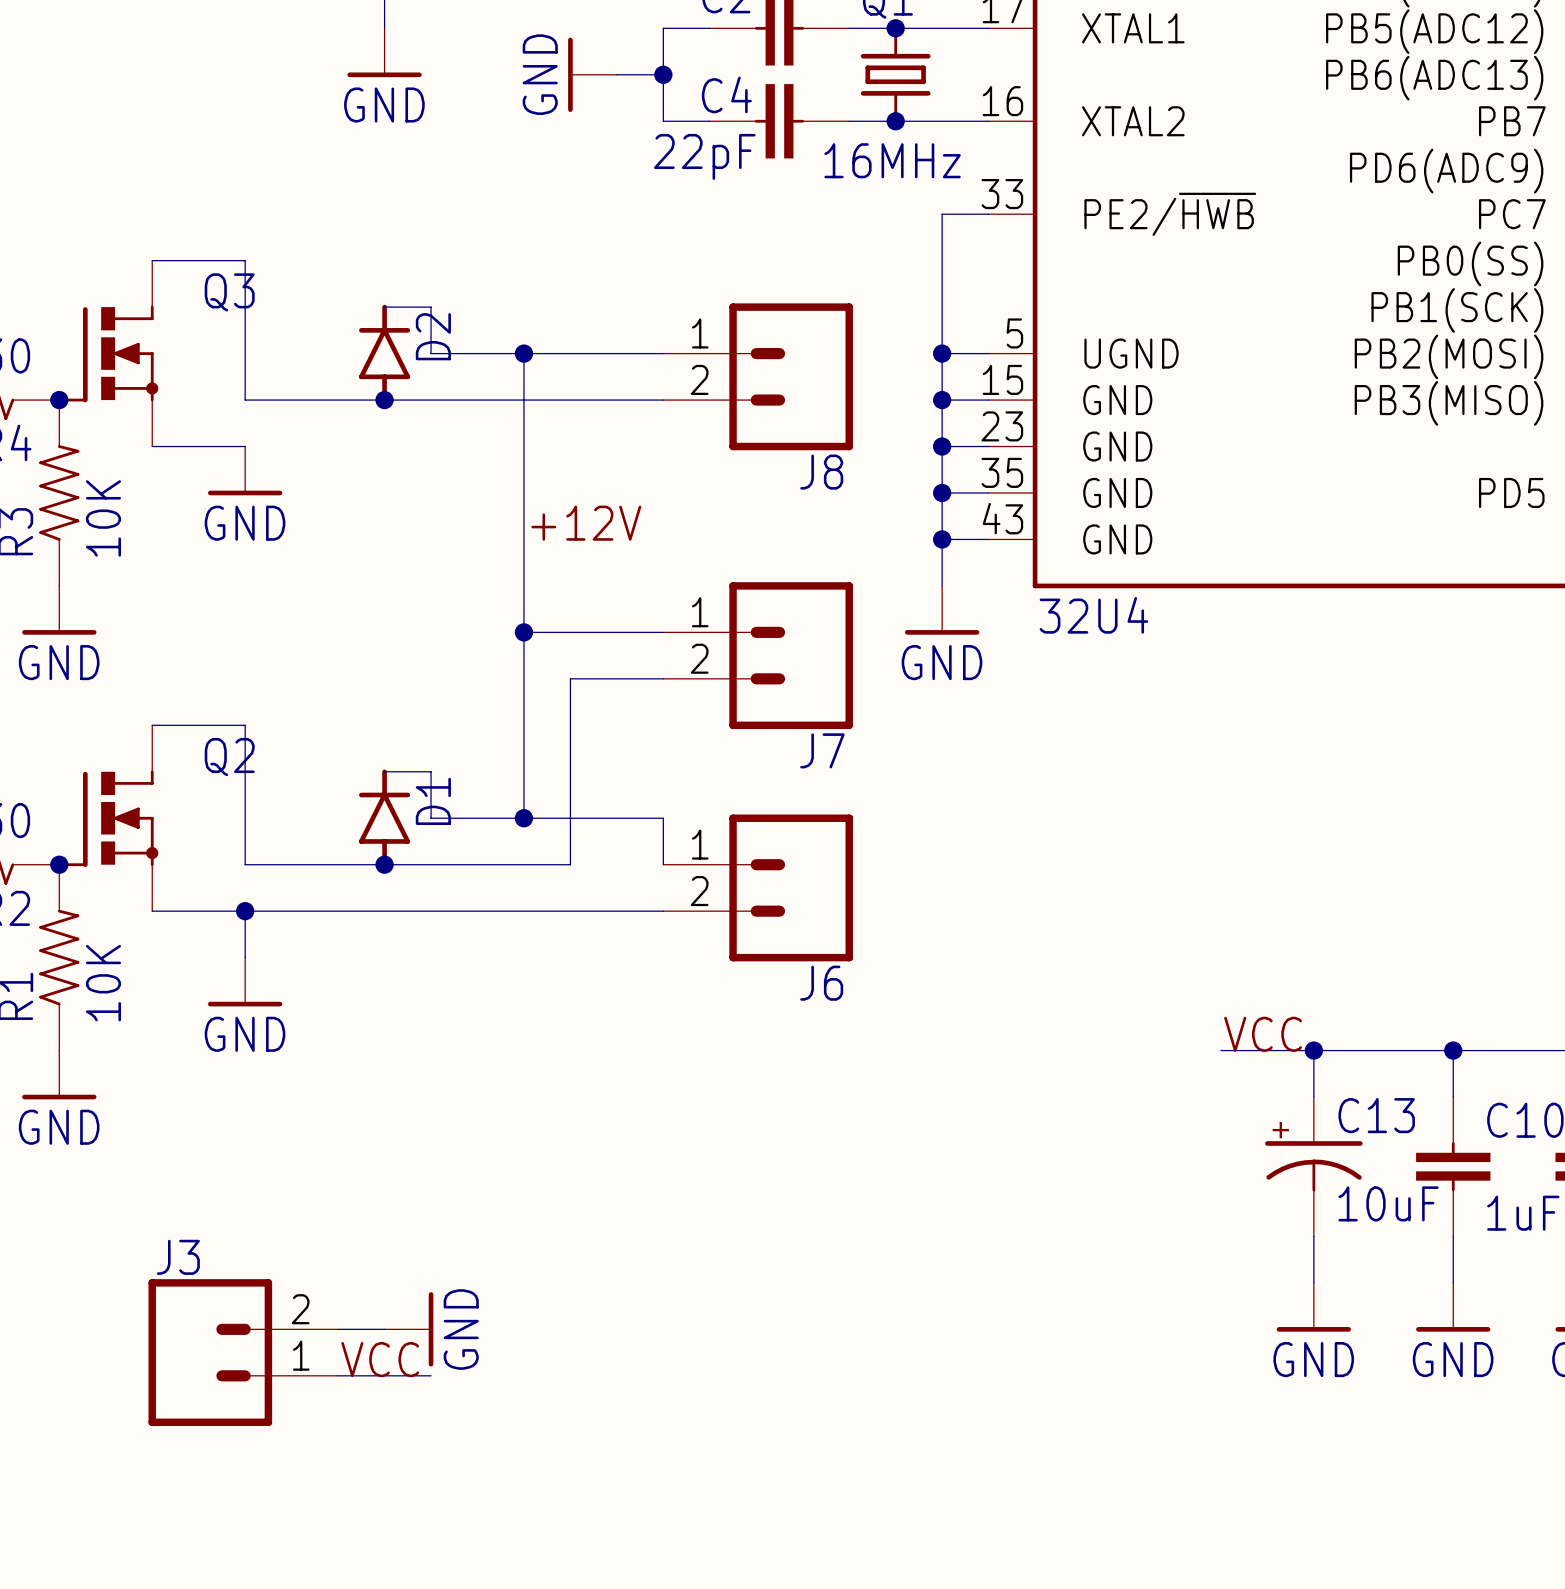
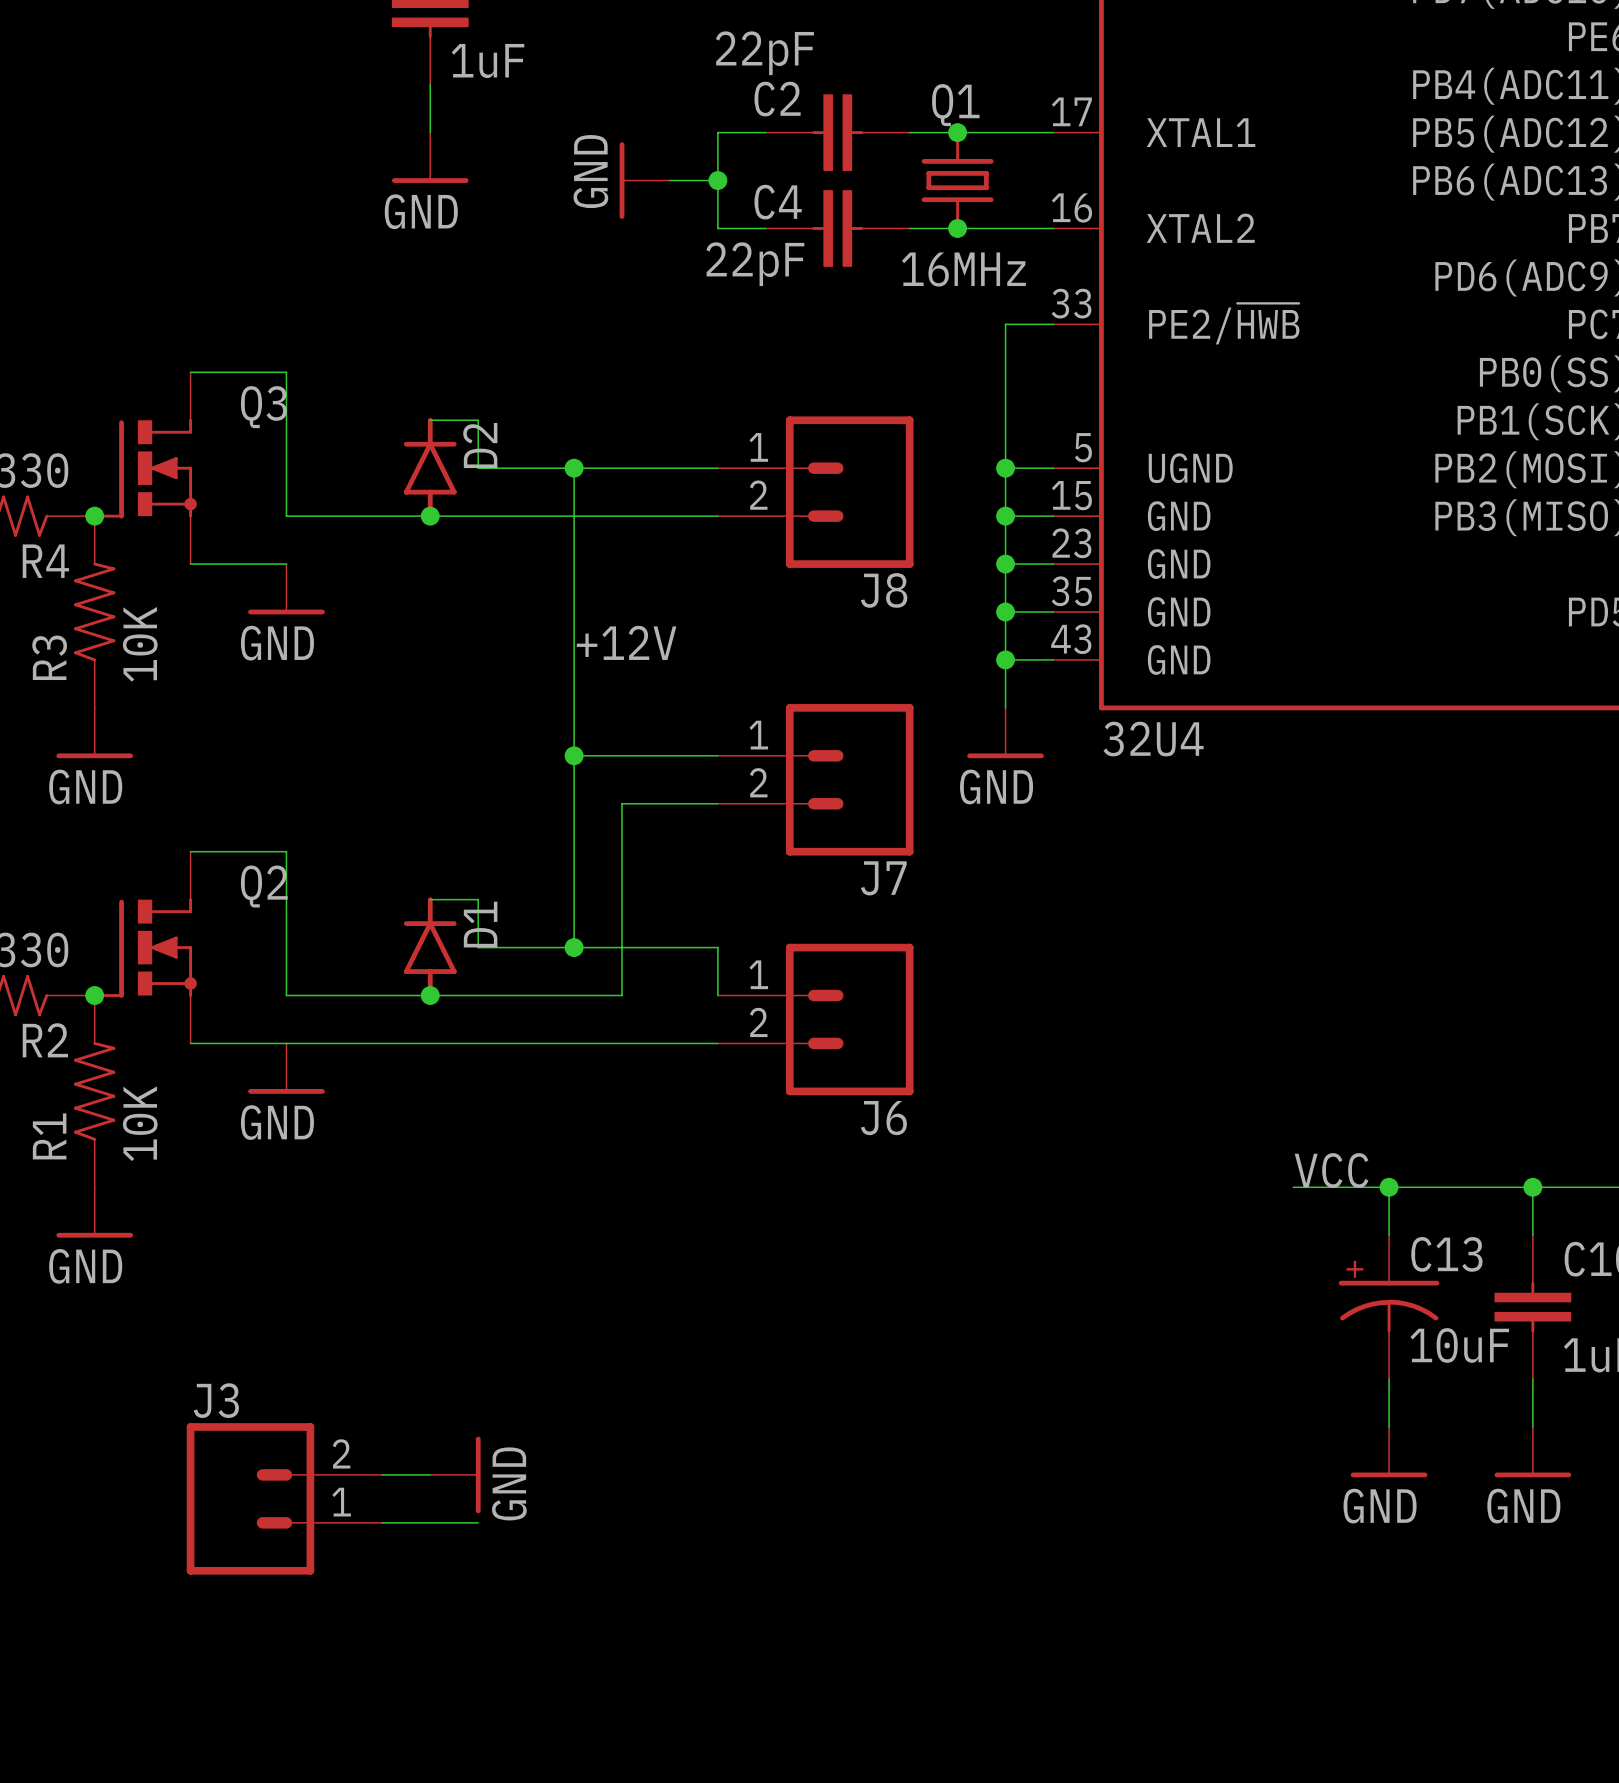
junction: (245, 911) -> none
power symbol position: GND (245, 982) -> GND (286, 1068)
label: VCC (380, 1359) -> none

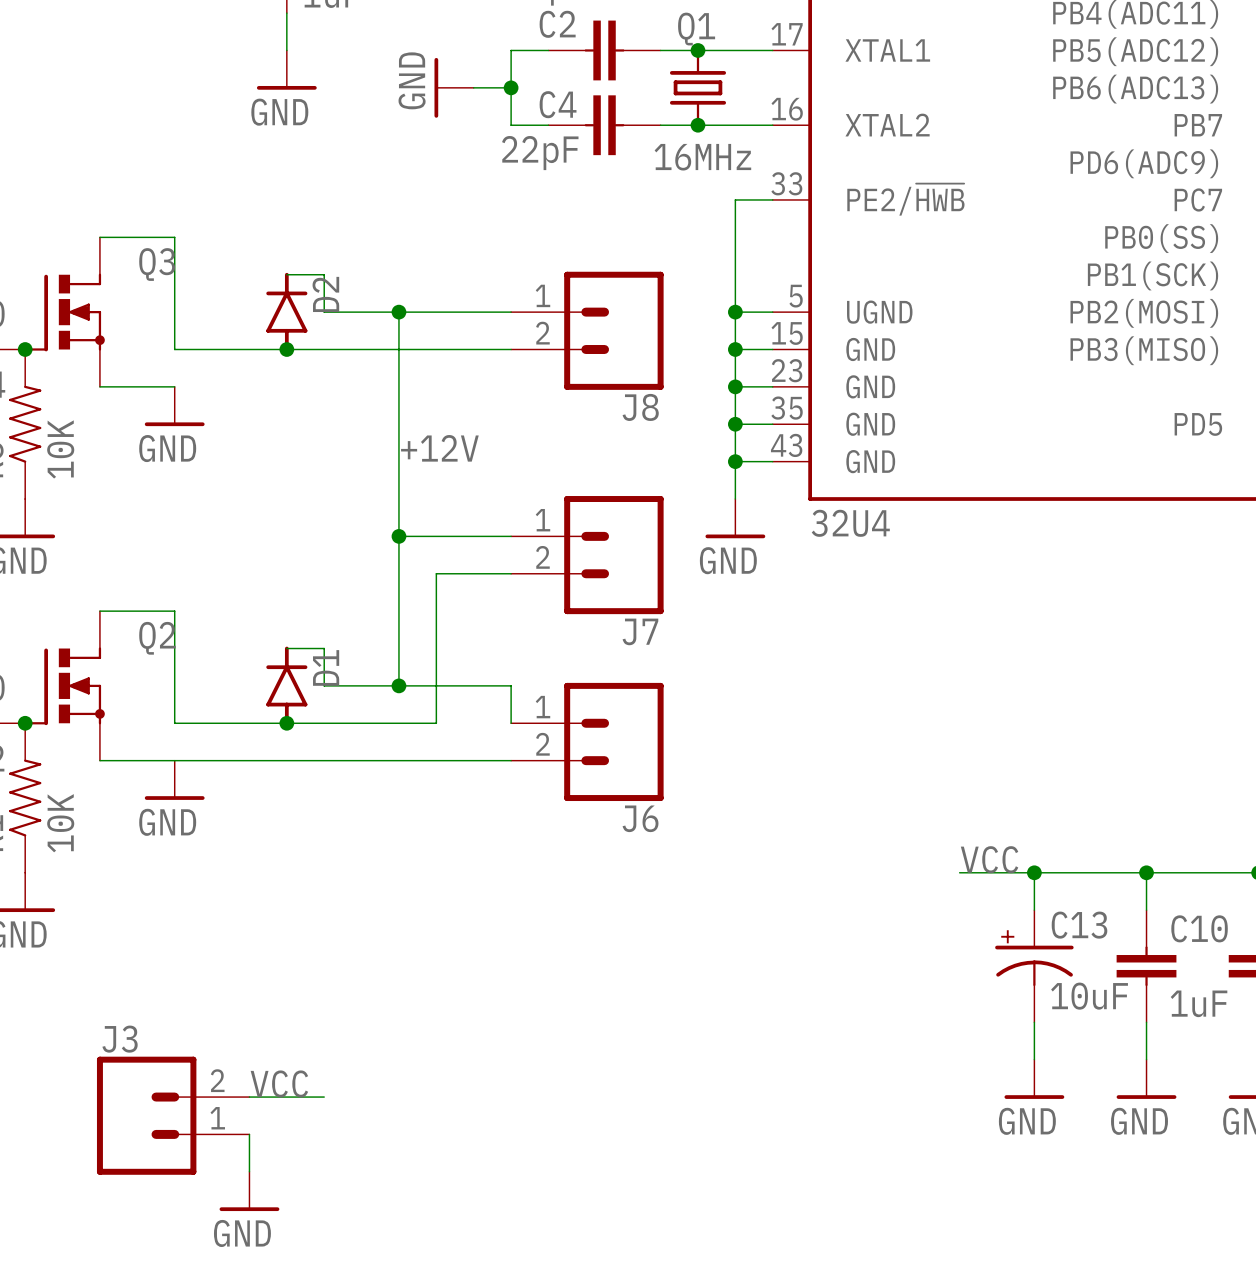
label: none -> VCC (279, 1083)
power symbol position: GND (455, 1474) -> GND (249, 1191)
power symbol rotation: 0° (478, 1474) -> 90° clockwise (249, 1209)
wire: (382, 1522) (478, 1522) -> (249, 1134) (249, 1171)

